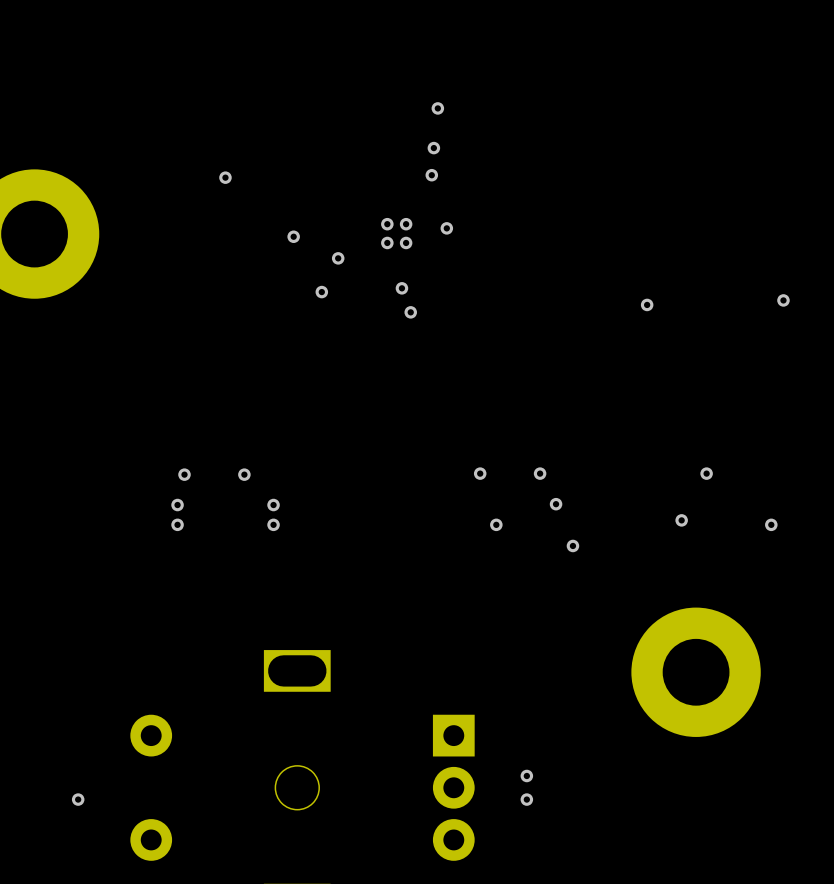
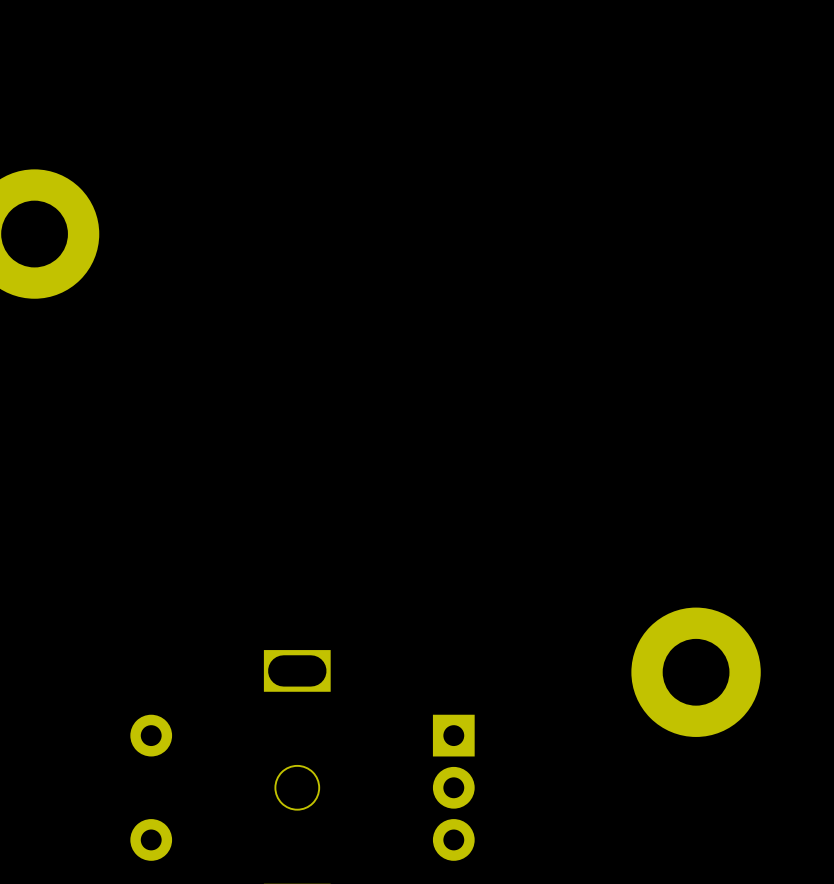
via: (437, 108) -> none
via: (433, 148) -> none
via: (431, 175) -> none
via: (225, 177) -> none
via: (387, 224) -> none
via: (406, 224) -> none
via: (446, 228) -> none
via: (293, 236) -> none
via: (387, 242) -> none
via: (406, 242) -> none
via: (338, 258) -> none
via: (401, 288) -> none
via: (321, 292) -> none
via: (783, 300) -> none
via: (647, 304) -> none
via: (410, 312) -> none
via: (480, 473) -> none
via: (540, 473) -> none
via: (706, 473) -> none
via: (184, 474) -> none
via: (244, 474) -> none
via: (556, 504) -> none
via: (177, 505) -> none
via: (273, 505) -> none
via: (681, 520) -> none
via: (177, 524) -> none
via: (273, 524) -> none
via: (496, 524) -> none
via: (771, 524) -> none
via: (572, 545) -> none
via: (526, 775) -> none
via: (78, 799) -> none
via: (526, 799) -> none

